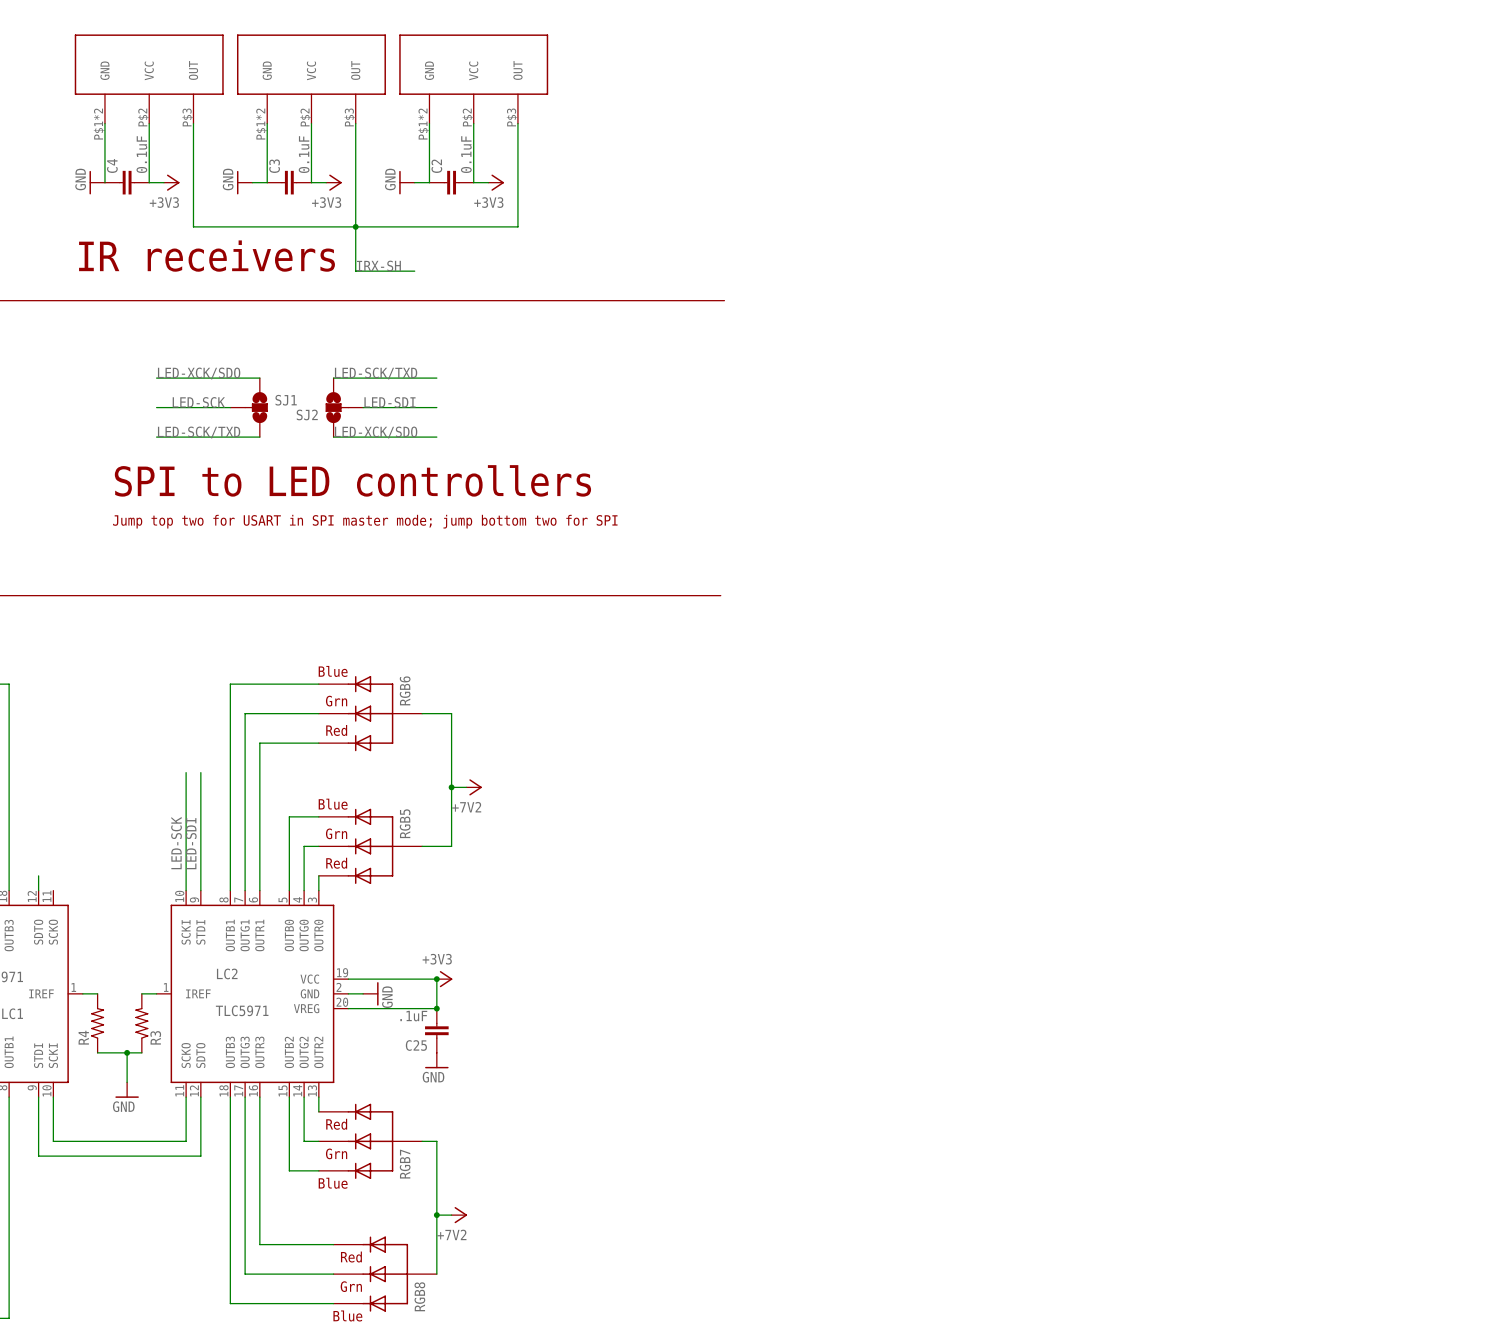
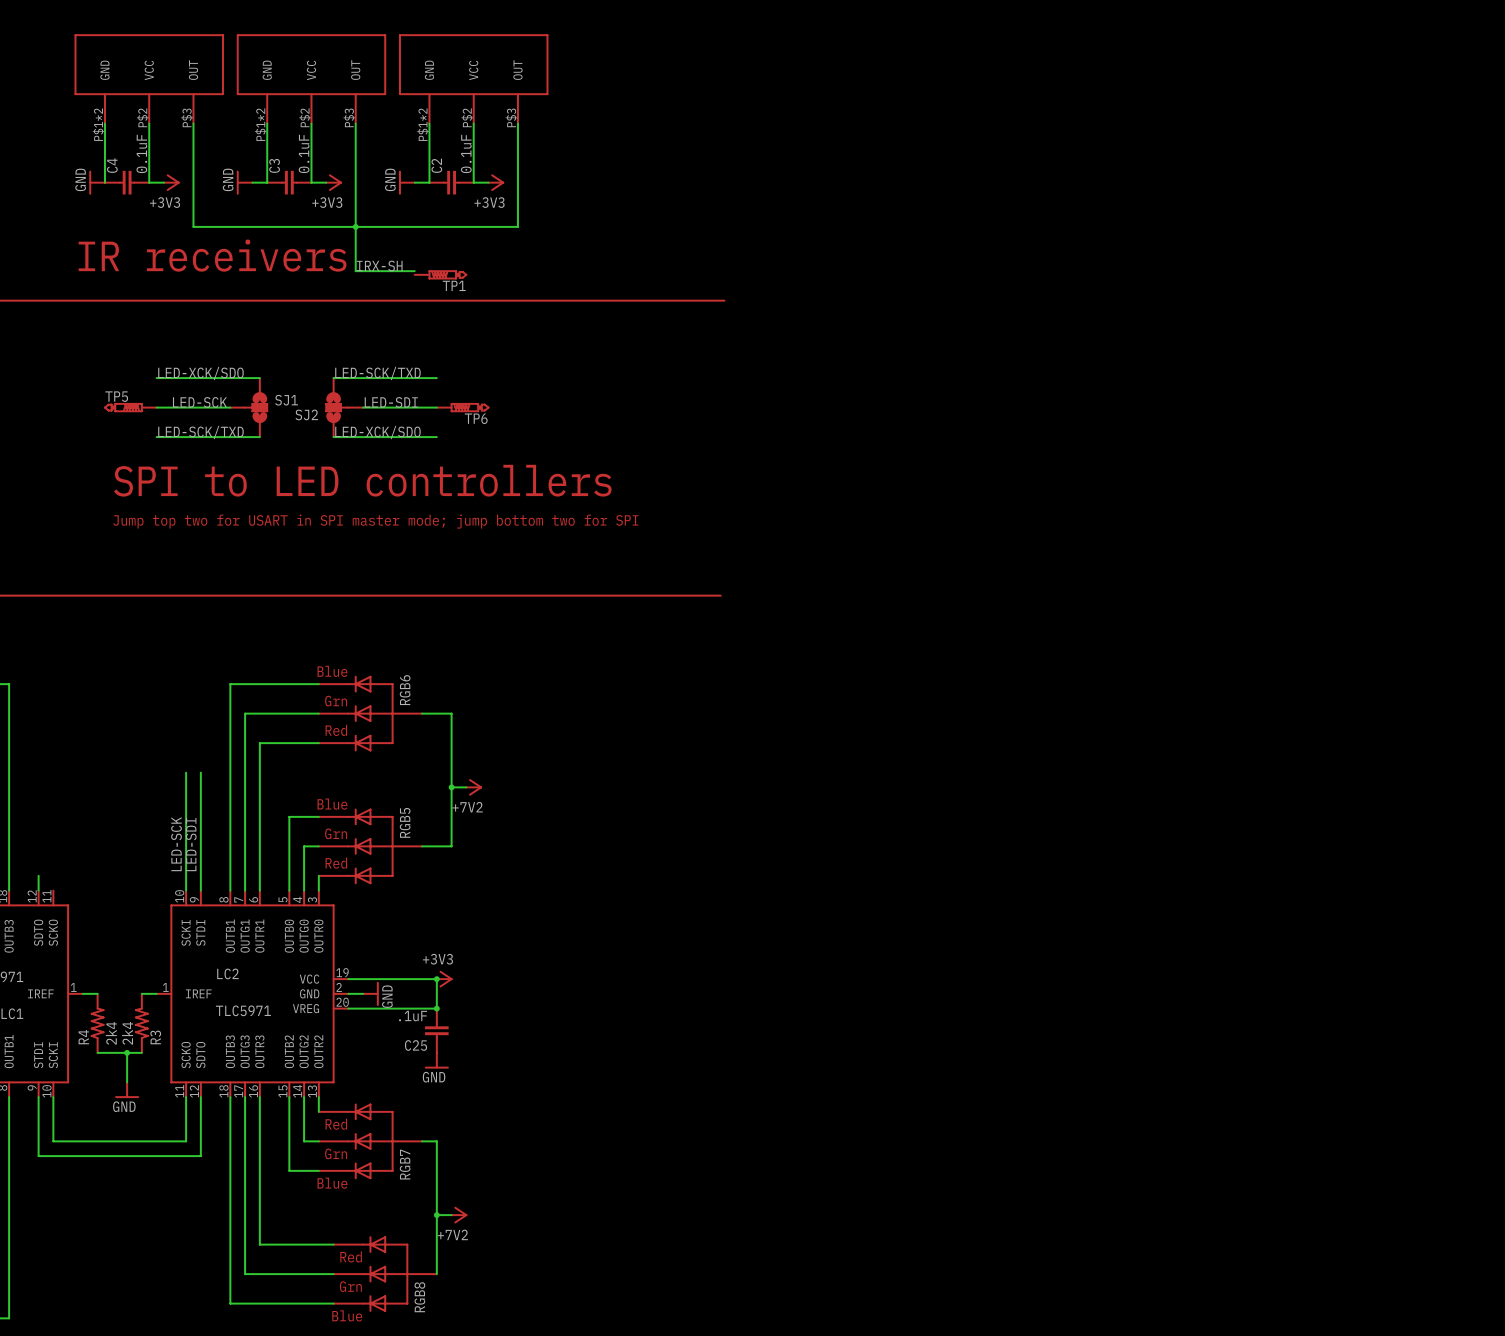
TP1: none -> (440, 274)
TP5: none -> (130, 407)
TP6: none -> (462, 407)
R4 value: none -> 2k4 (111, 1033)
R3 value: none -> 2k4 (127, 1033)

